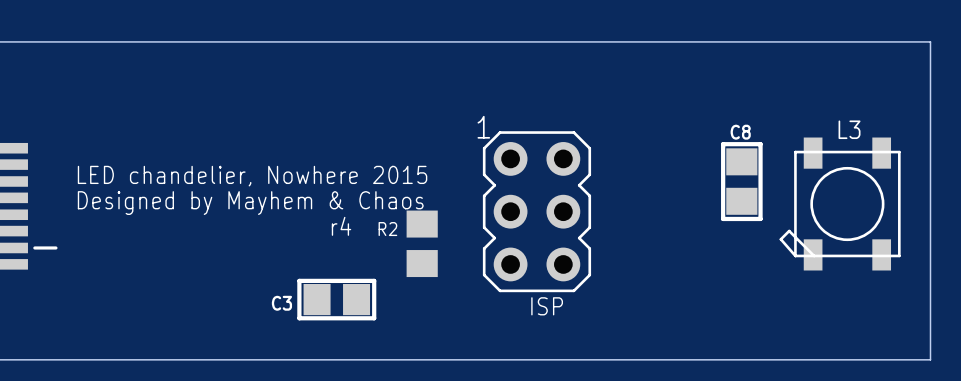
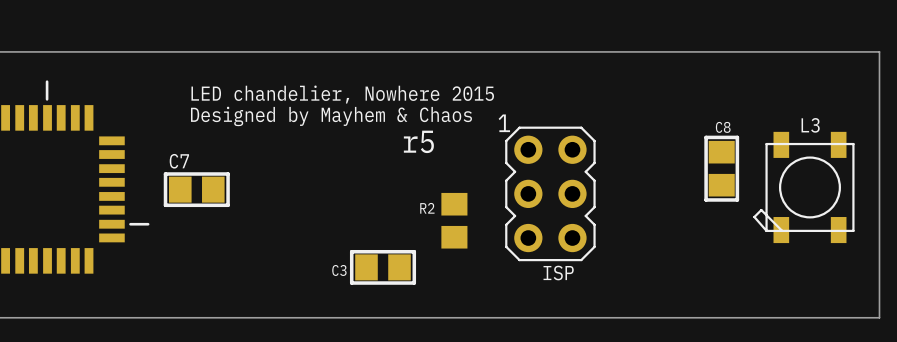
text: none -> r5 (418, 141)
text position: LED chandelier, Nowhere 2015 (252, 176) -> LED chandelier, Nowhere 2015 (342, 94)
text position: Designed by Mayhem & Chaos (250, 203) -> Designed by Mayhem & Chaos (331, 116)
C7: none -> (196, 189)
text: r4 (341, 226) -> none

